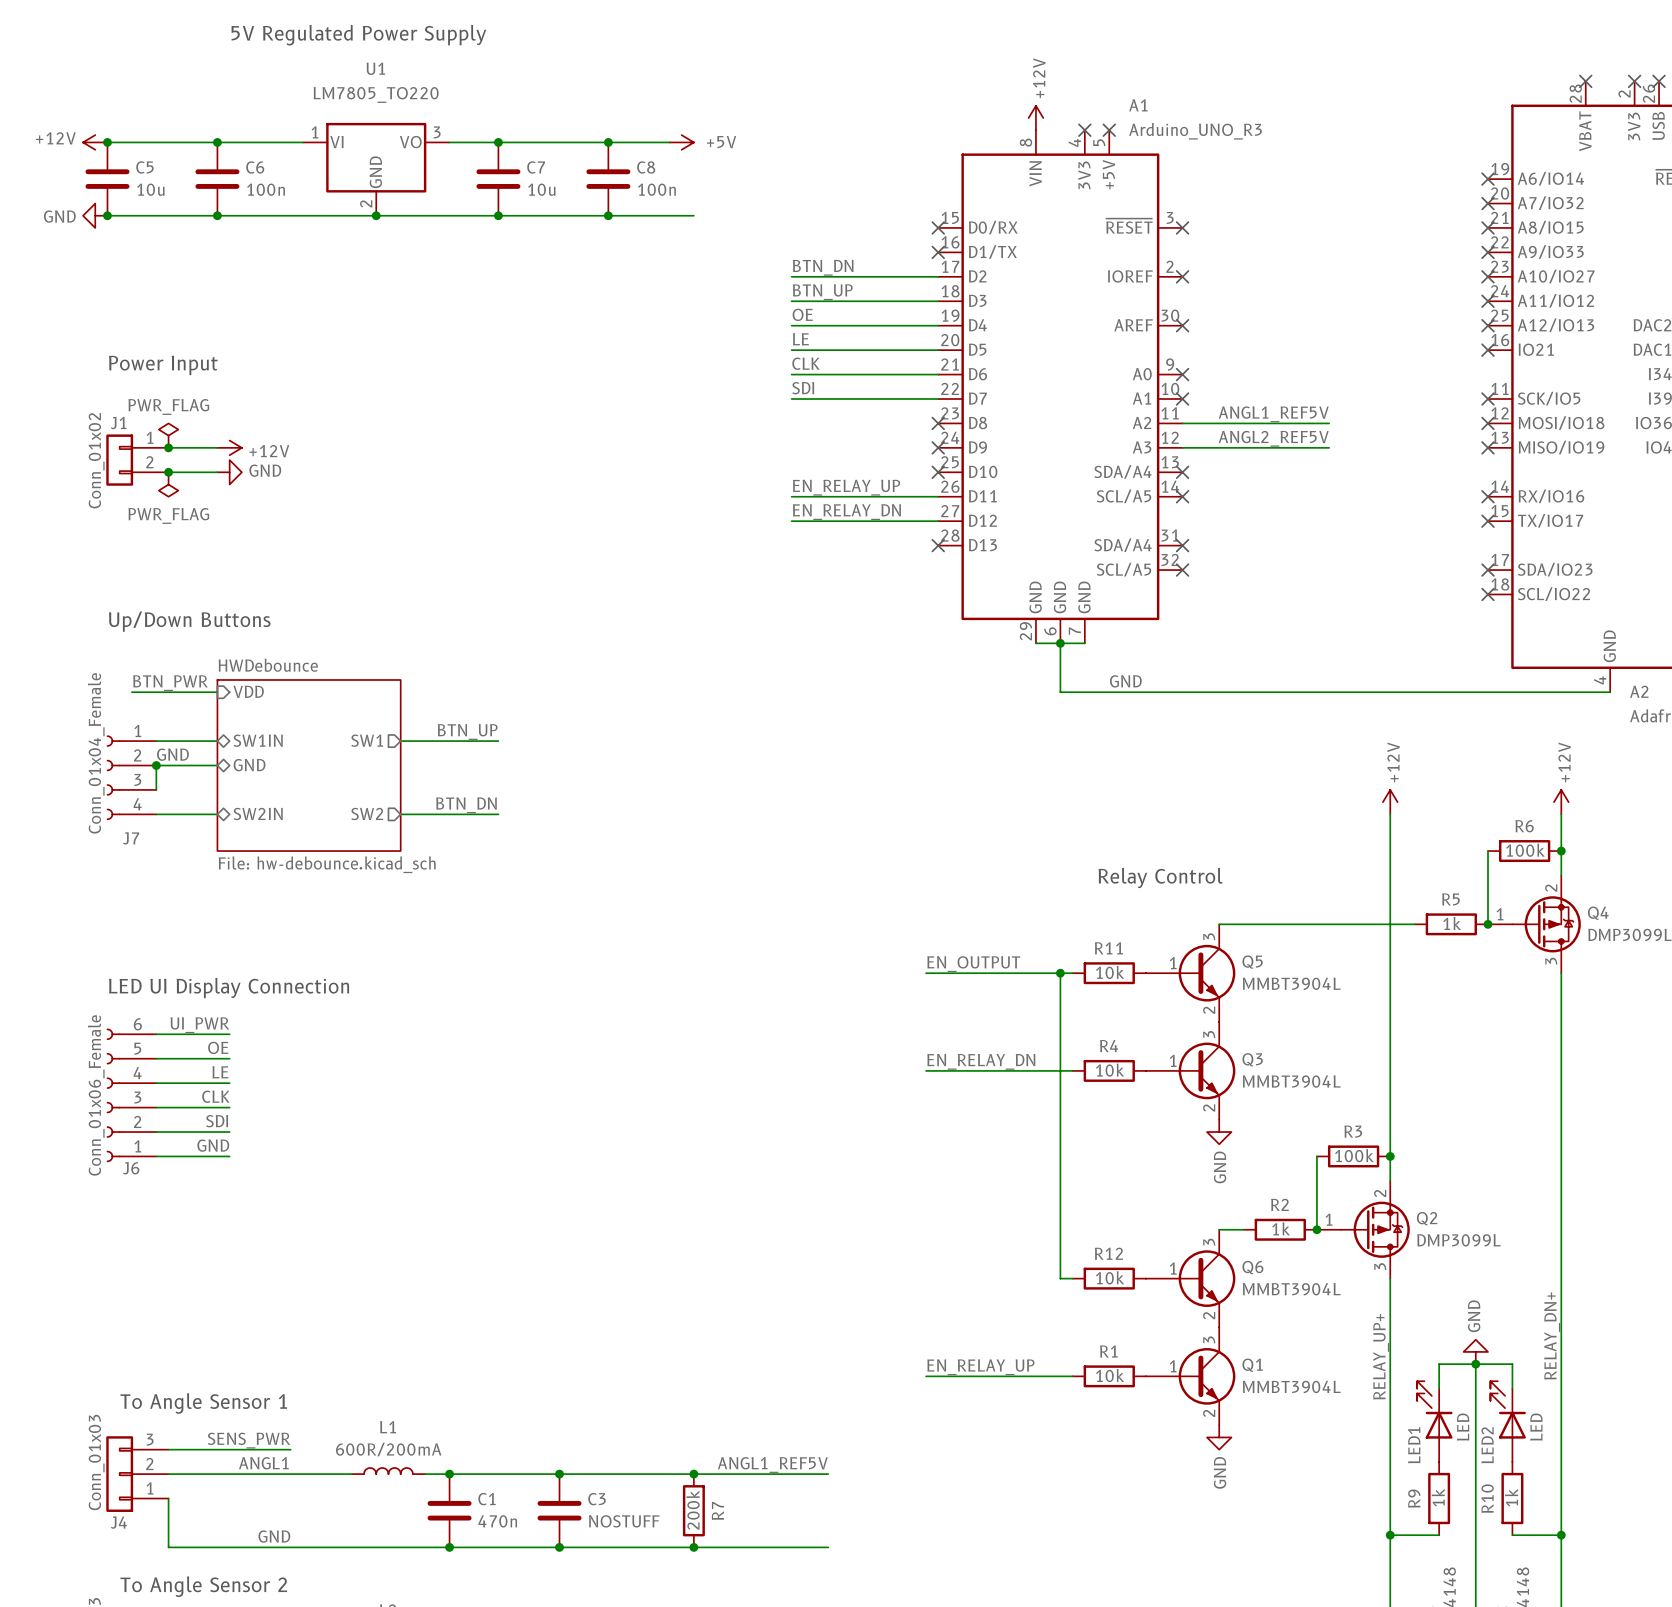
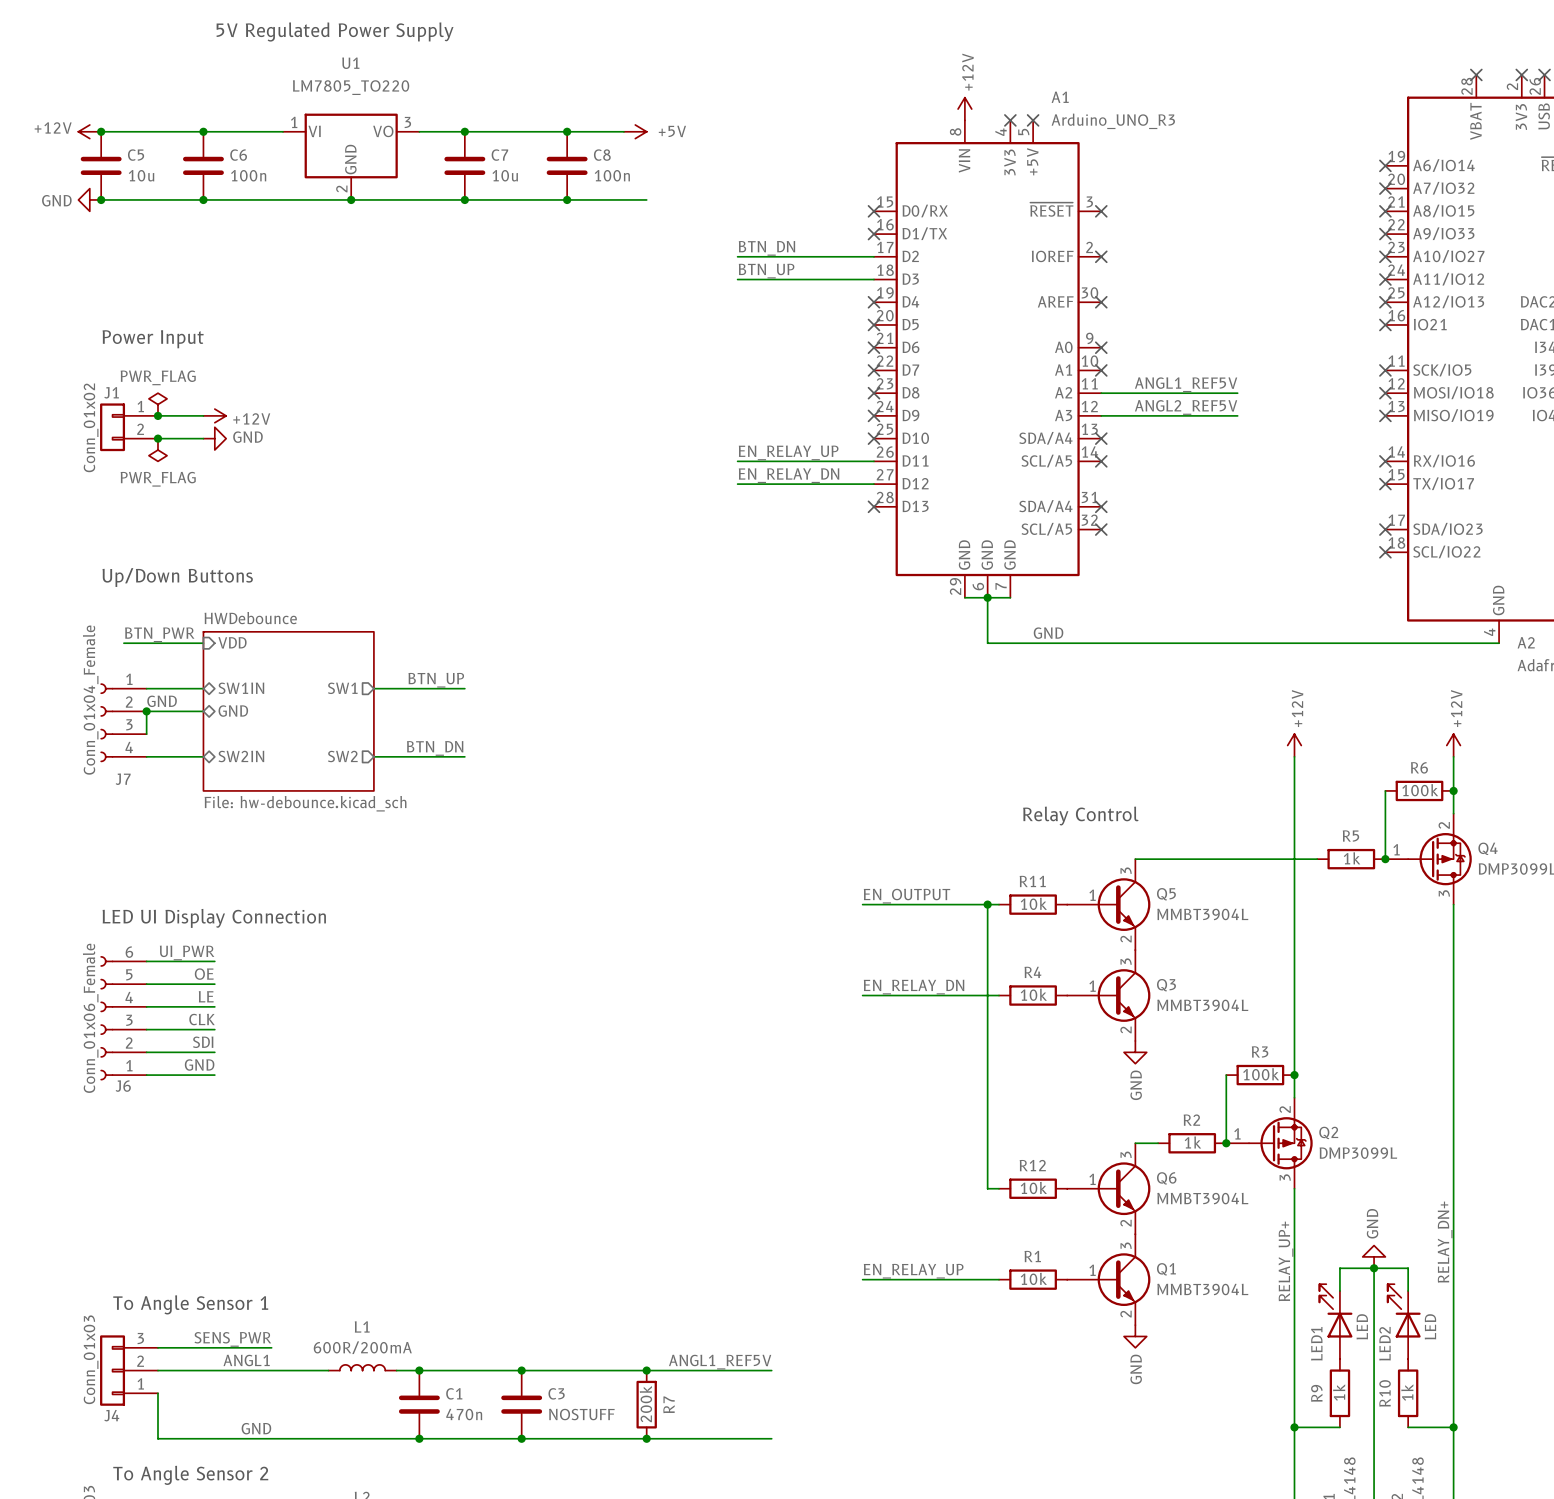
label: OE (802, 314) -> none
wire: (791, 325) (938, 325) -> none
no-connect mark: none -> (873, 302)
label: LE (800, 339) -> none
wire: (791, 350) (938, 350) -> none
no-connect mark: none -> (873, 324)
label: CLK (806, 363) -> none
wire: (791, 374) (938, 374) -> none
no-connect mark: none -> (873, 347)
label: SDI (803, 388) -> none
wire: (791, 399) (938, 399) -> none
no-connect mark: none -> (873, 370)

